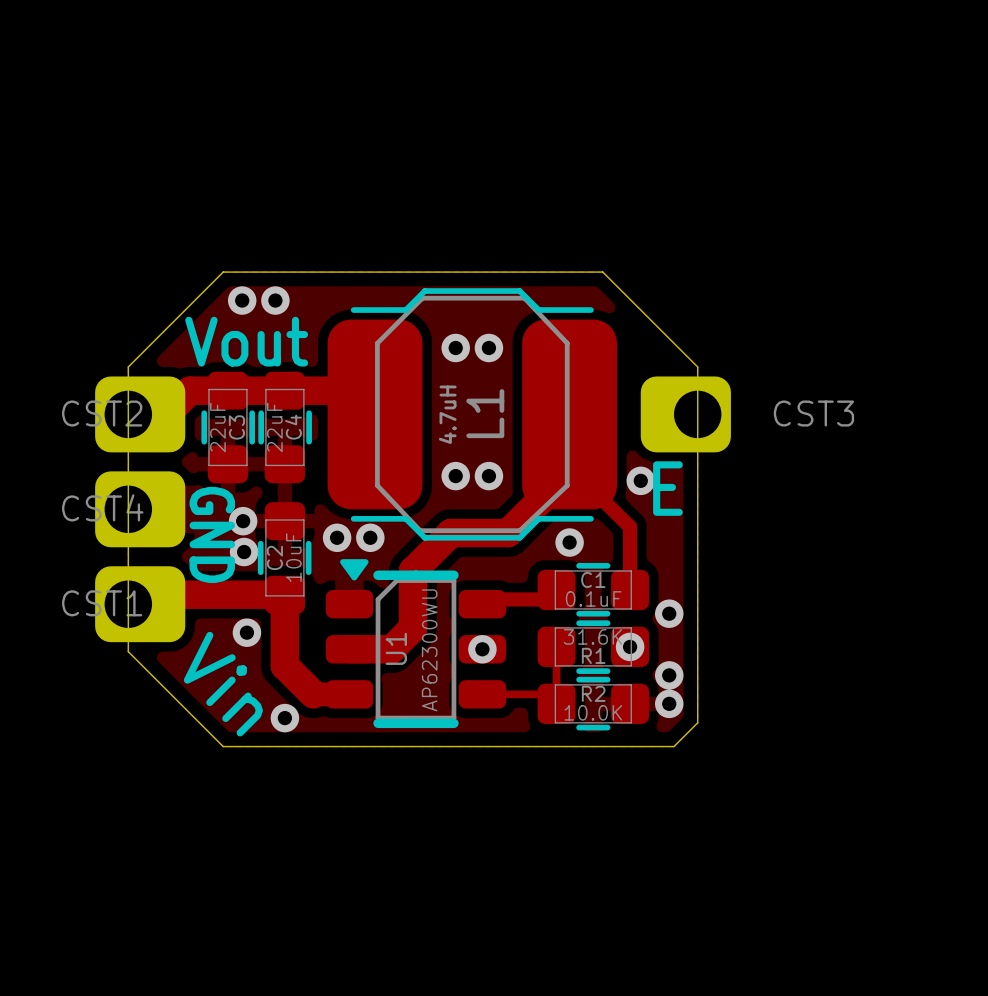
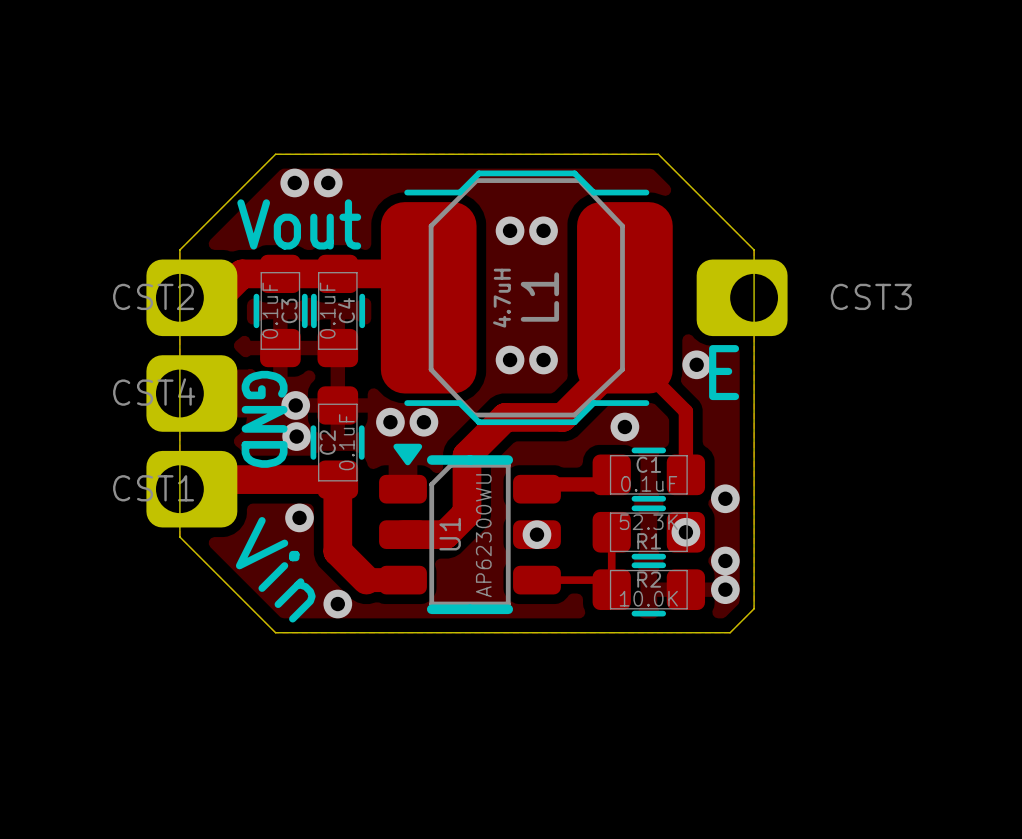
C3 value: 22uF (217, 427) -> 0.1uF (270, 310)
C4 value: 22uF (274, 427) -> 0.1uF (327, 310)
C2 value: 10uF (293, 557) -> 0.1uF (346, 442)
R1 value: 31.6K (592, 636) -> 52.3K (648, 522)

